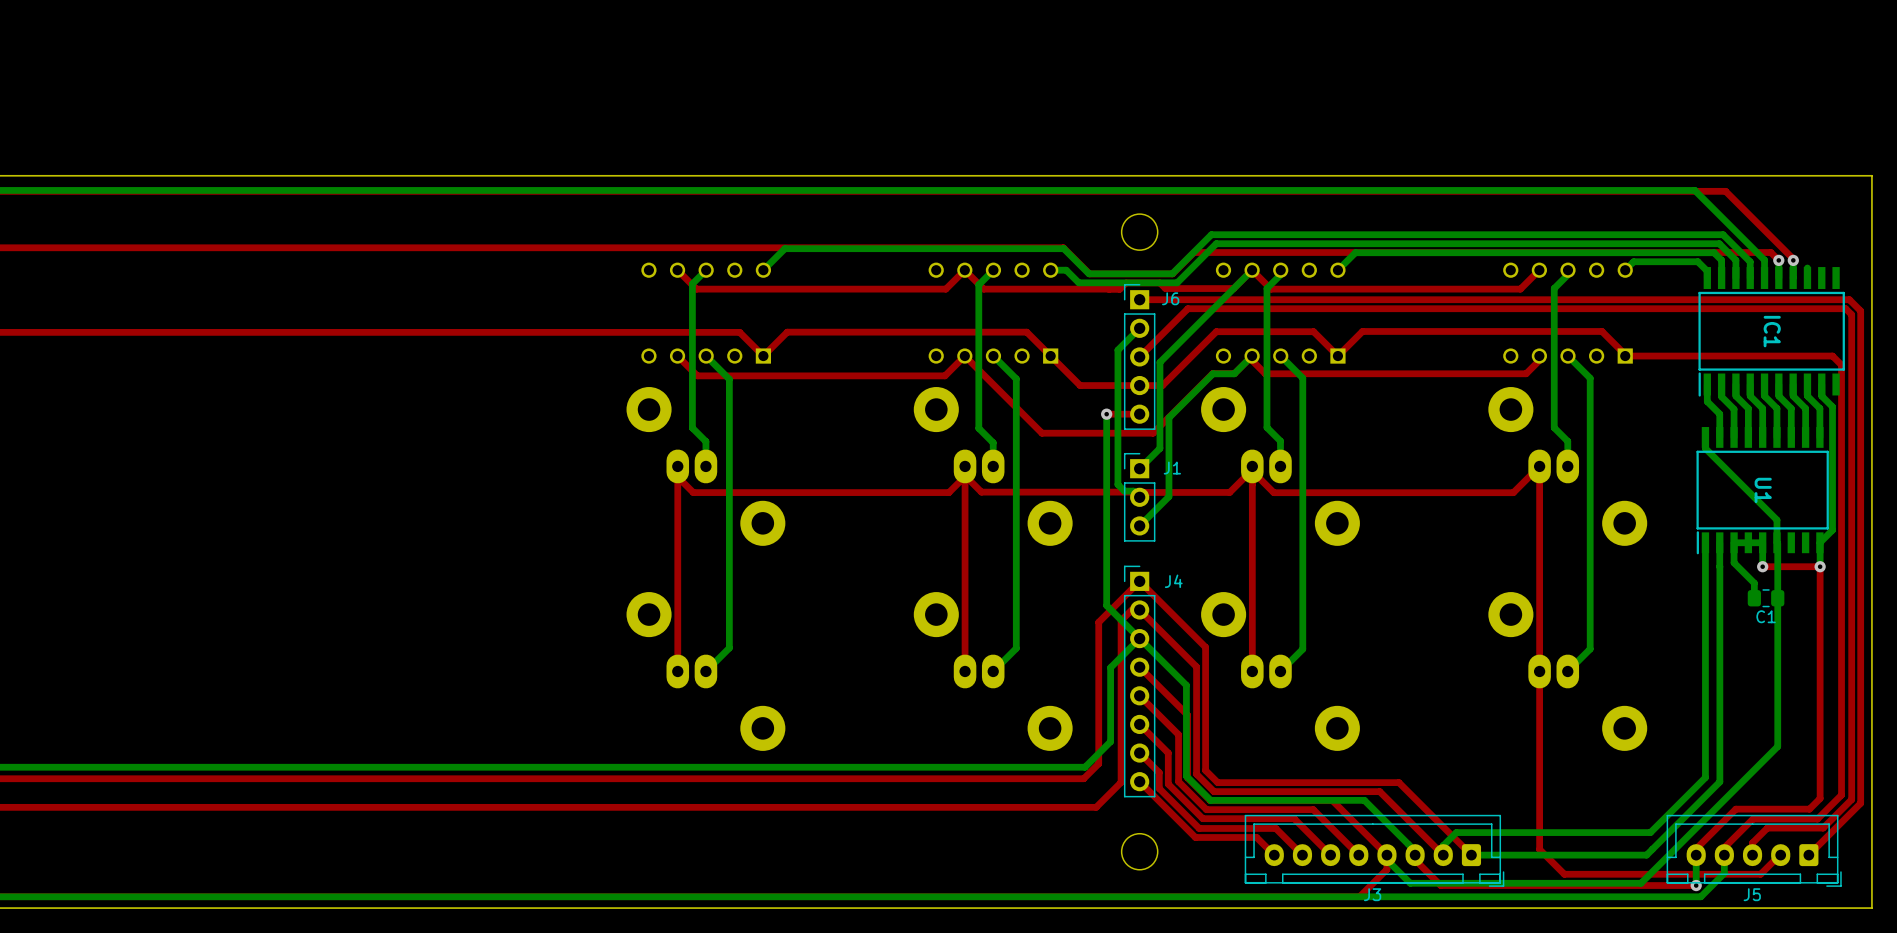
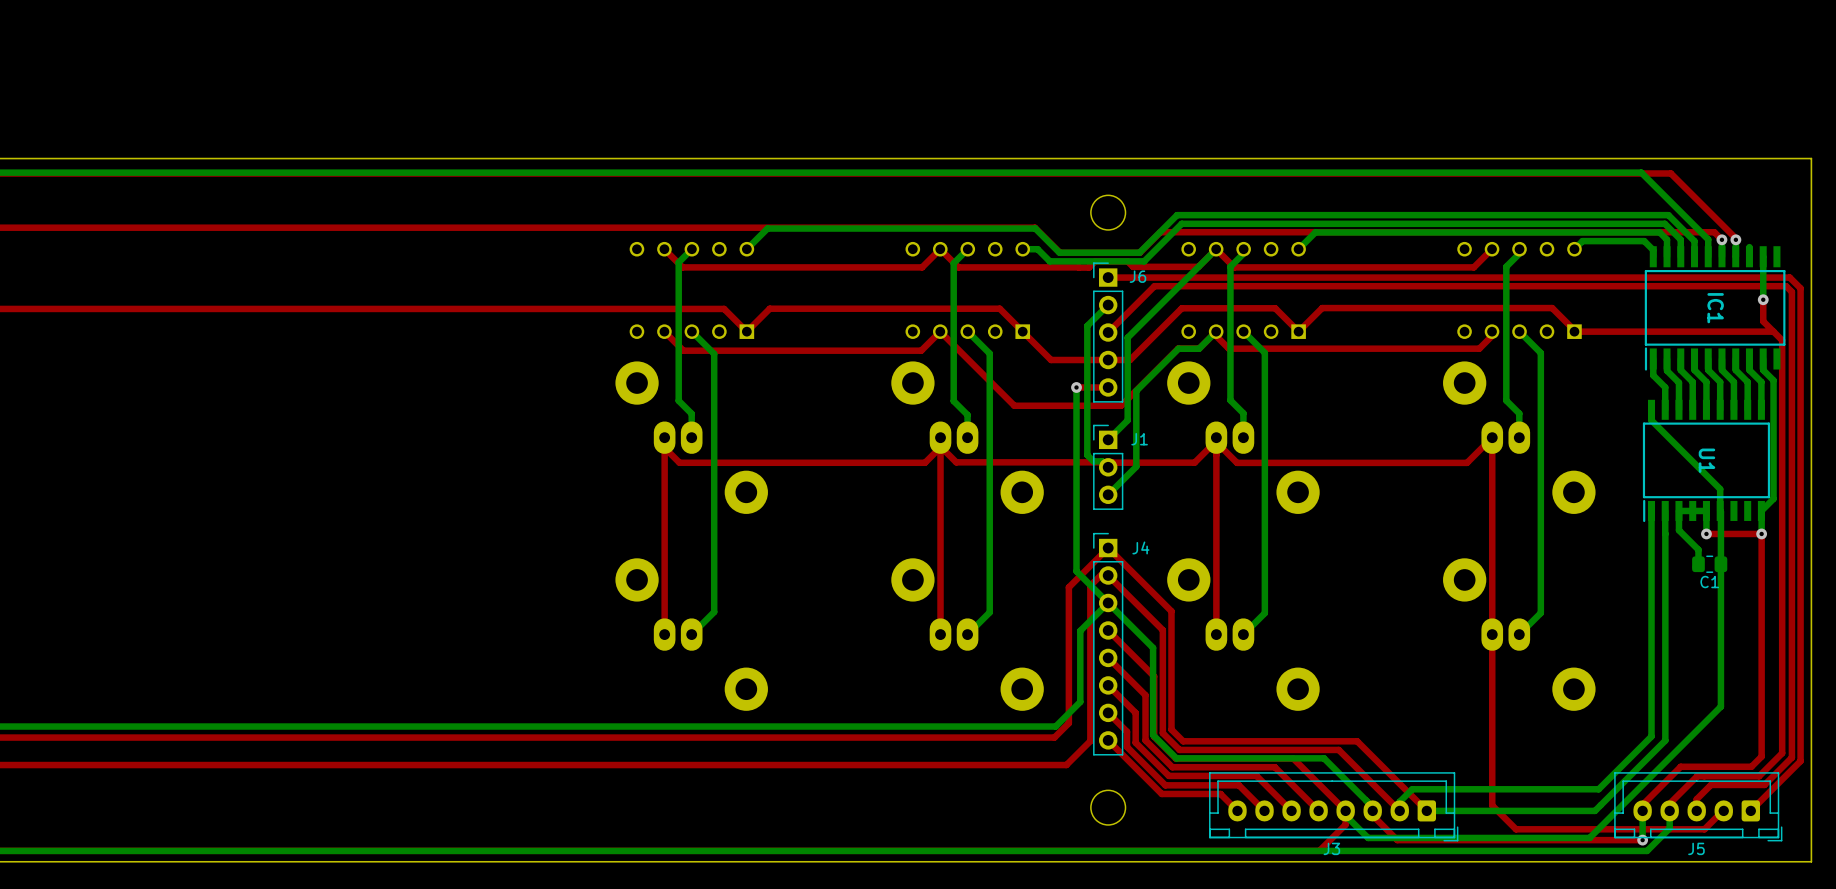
bottom track: none -> (1763, 256) (1763, 299)
top track: none -> (1763, 299) (1763, 321) (1773, 331)
via: none -> (1763, 299)

